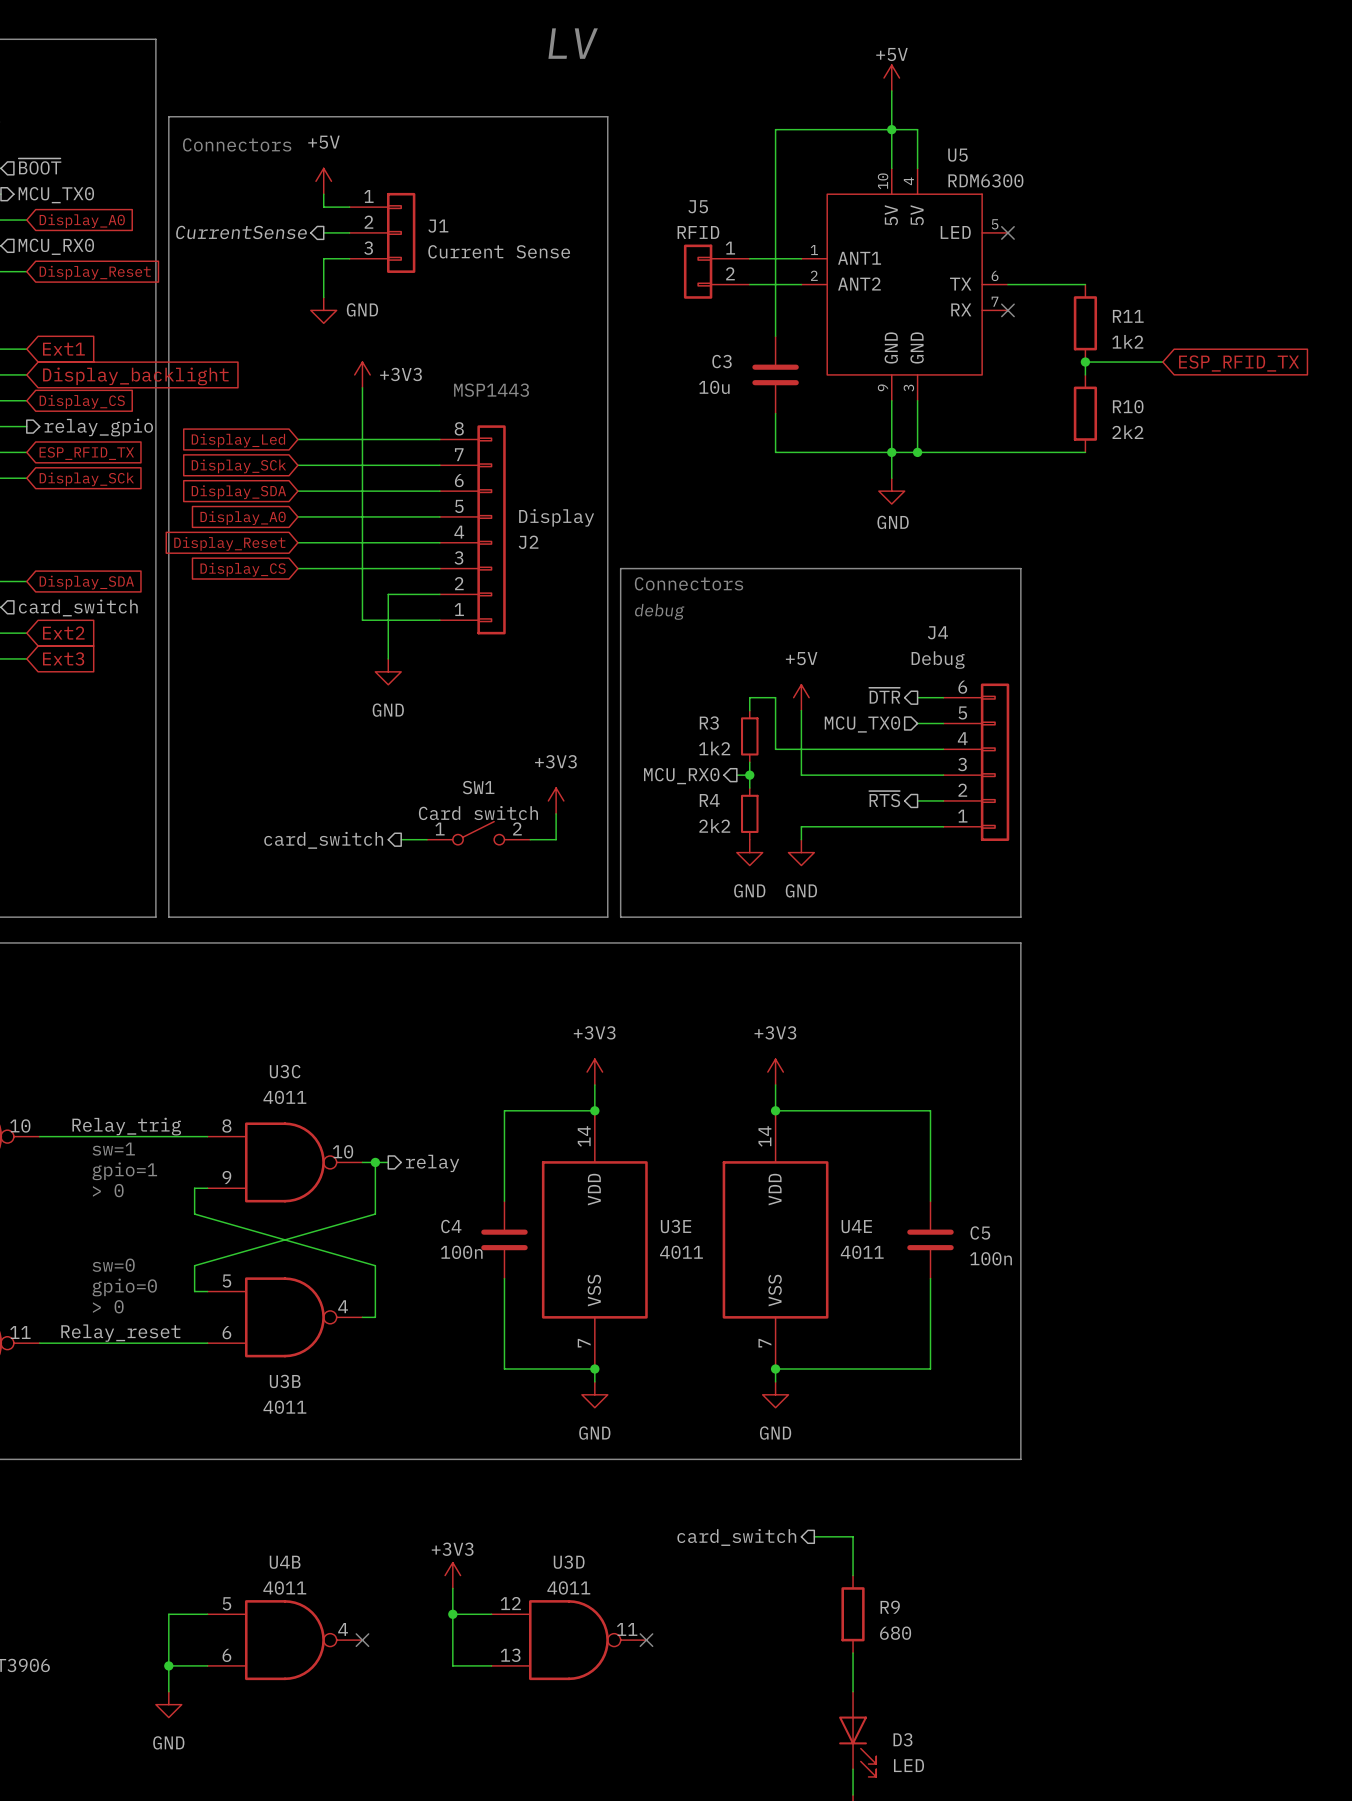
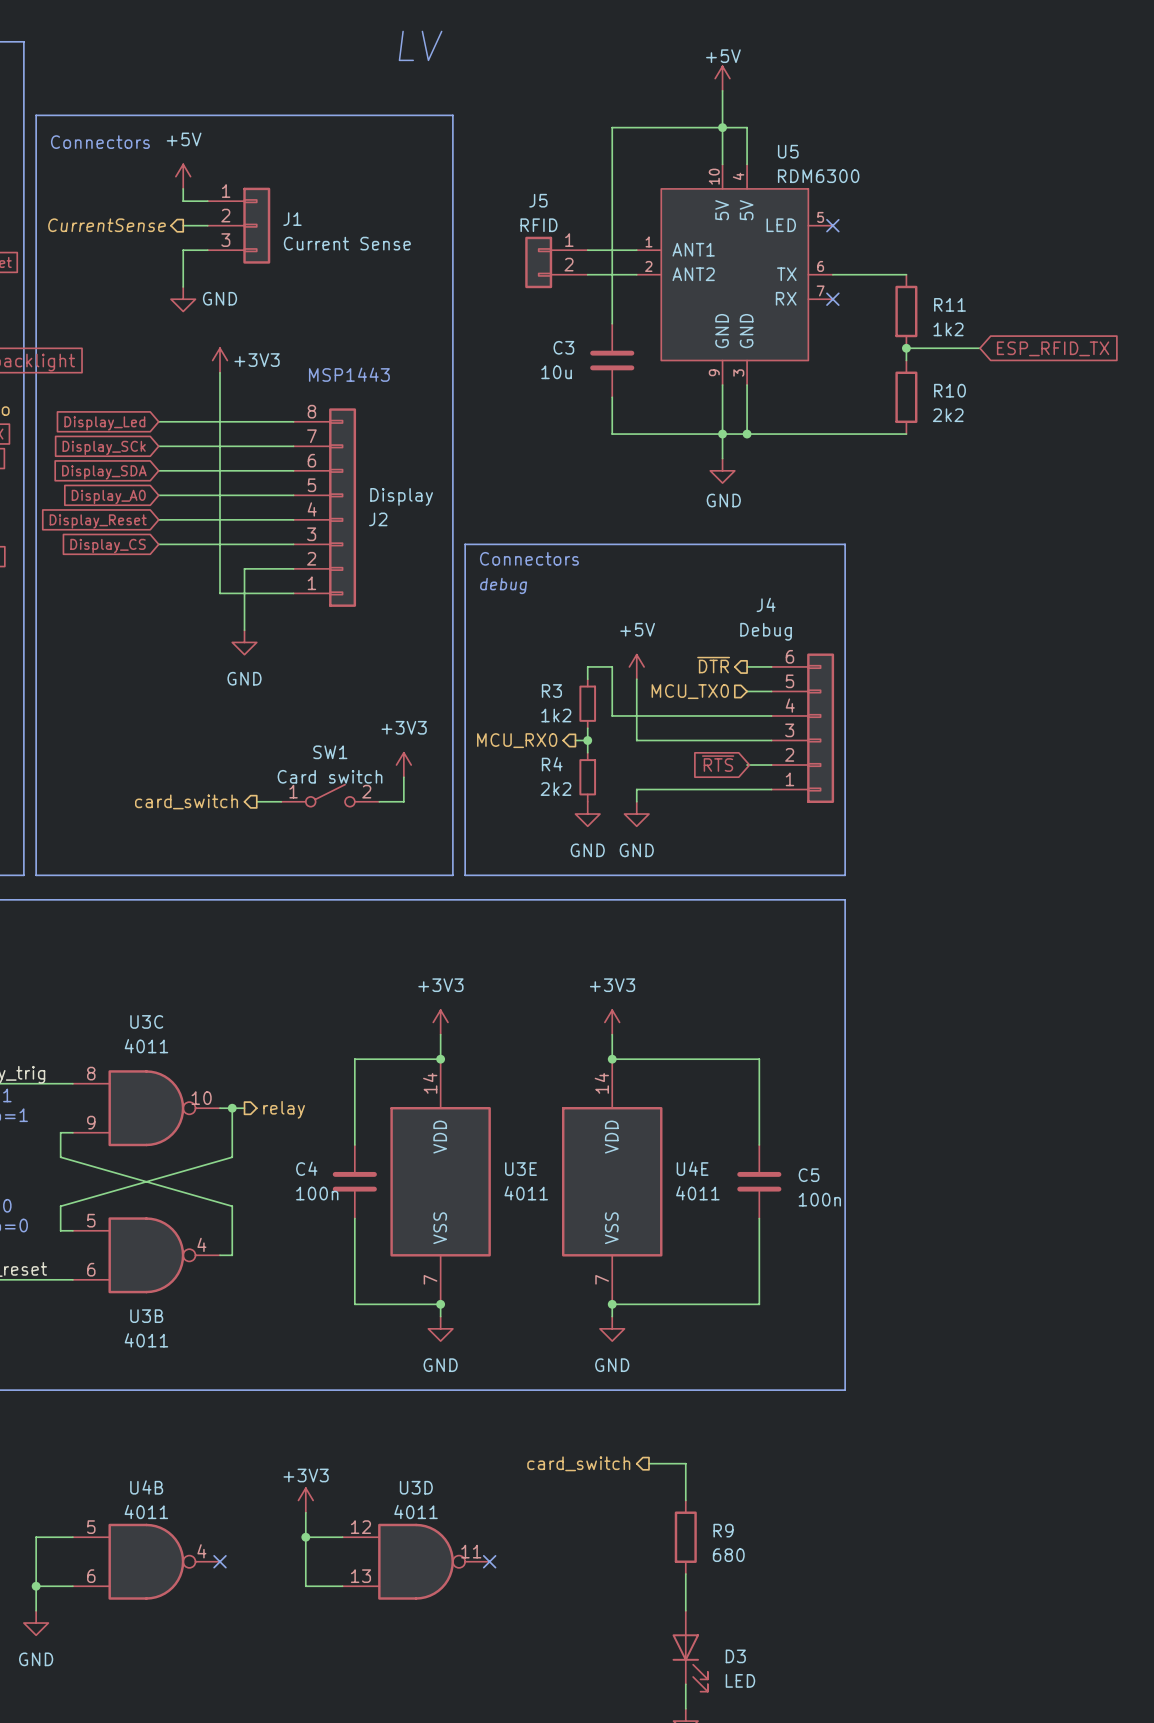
hierarchical label: ~{RTS} (884, 799) -> none
global label: none -> ~{RTS} (718, 763)

